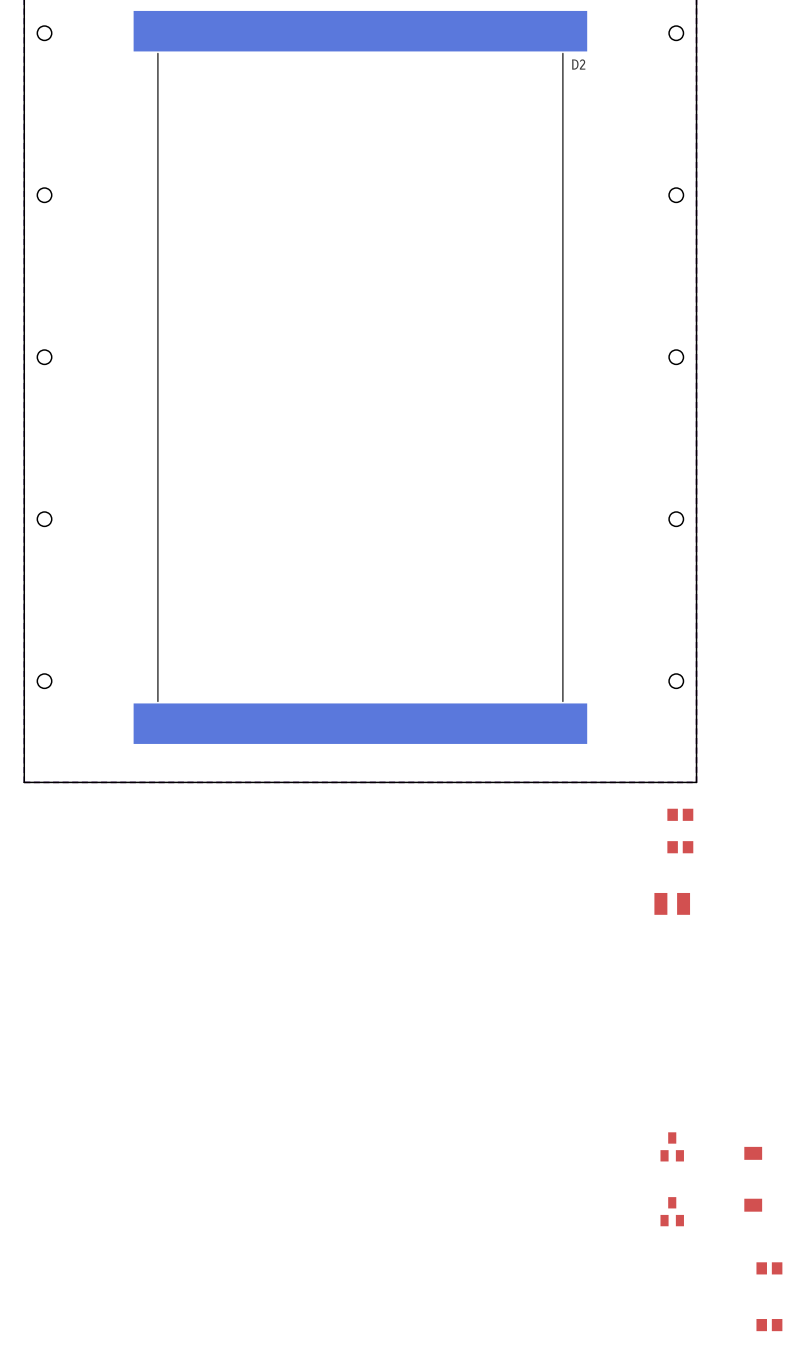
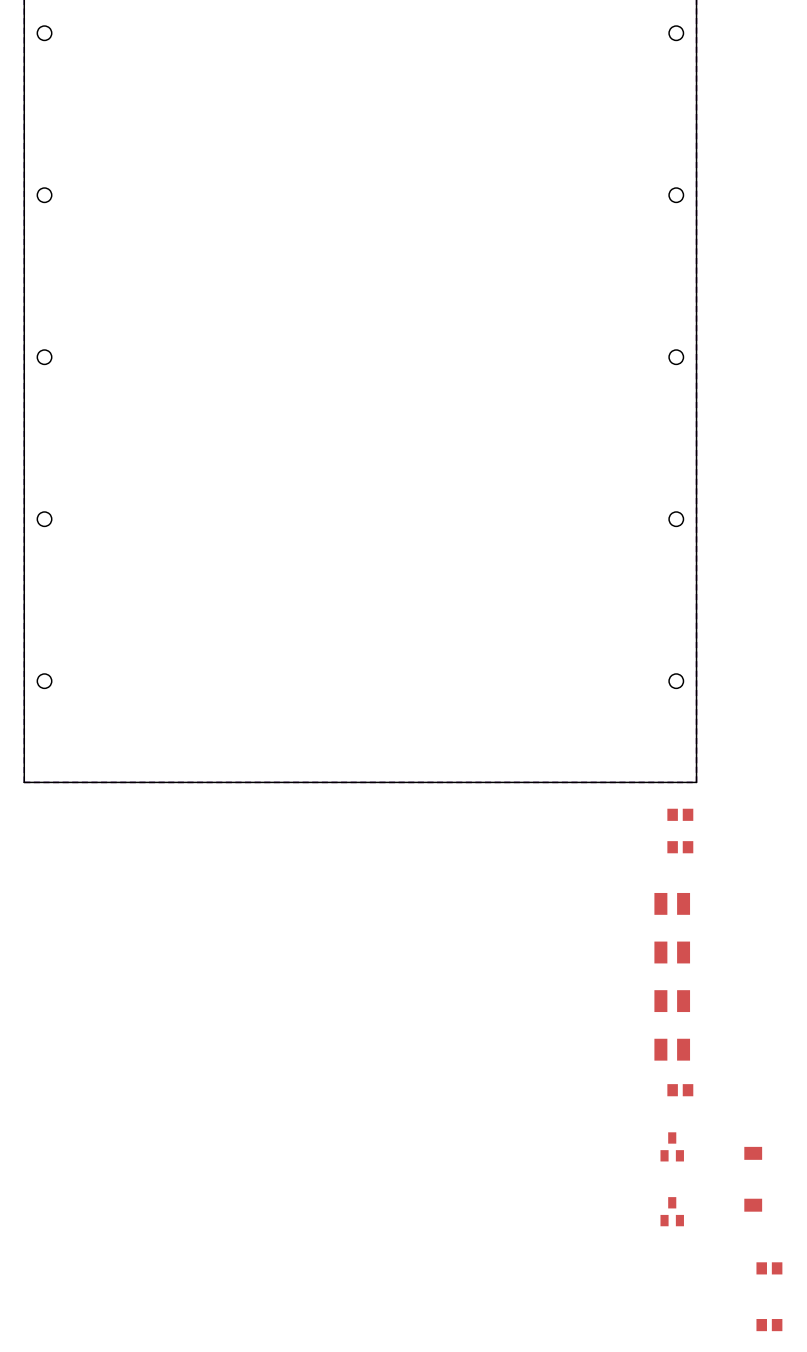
D2: (360, 377) -> none
part: none -> (672, 952)
part: none -> (672, 1001)
part: none -> (672, 1049)
part: none -> (680, 1090)

